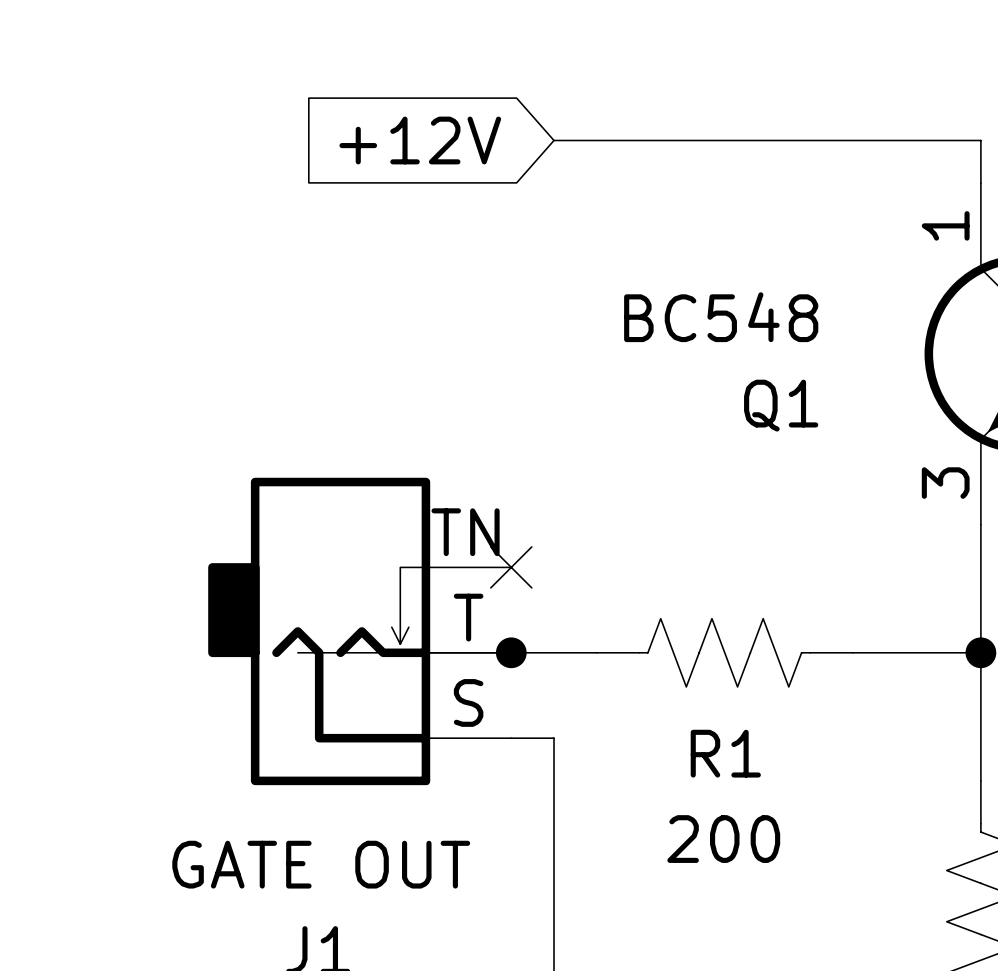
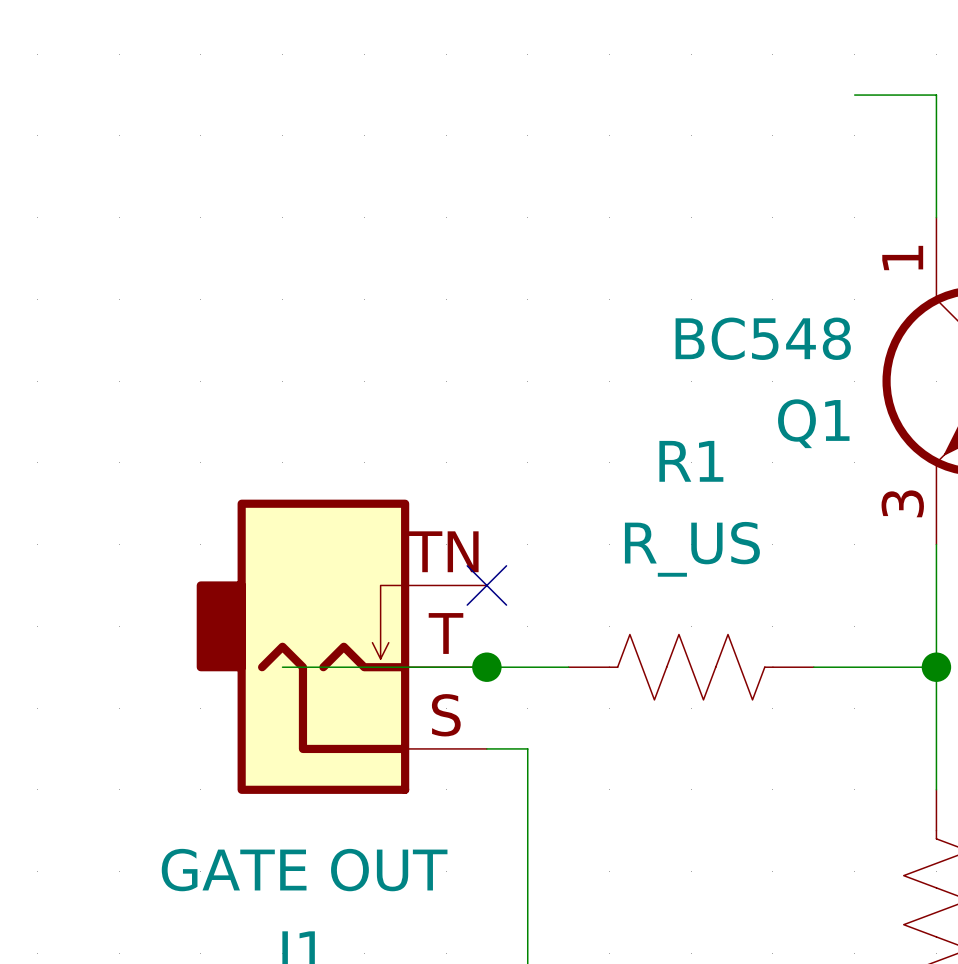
global label: +12V (420, 140) -> none
wire: (554, 140) (980, 140) -> (854, 95) (936, 95) (936, 176)
Q1 value position: BC548 (721, 317) -> BC548 (763, 338)
Q1 name position: Q1 (781, 405) -> Q1 (813, 423)
R1 name position: R1 (725, 753) -> R1 (691, 461)
R1 value: 200 (723, 839) -> R_US (692, 549)

